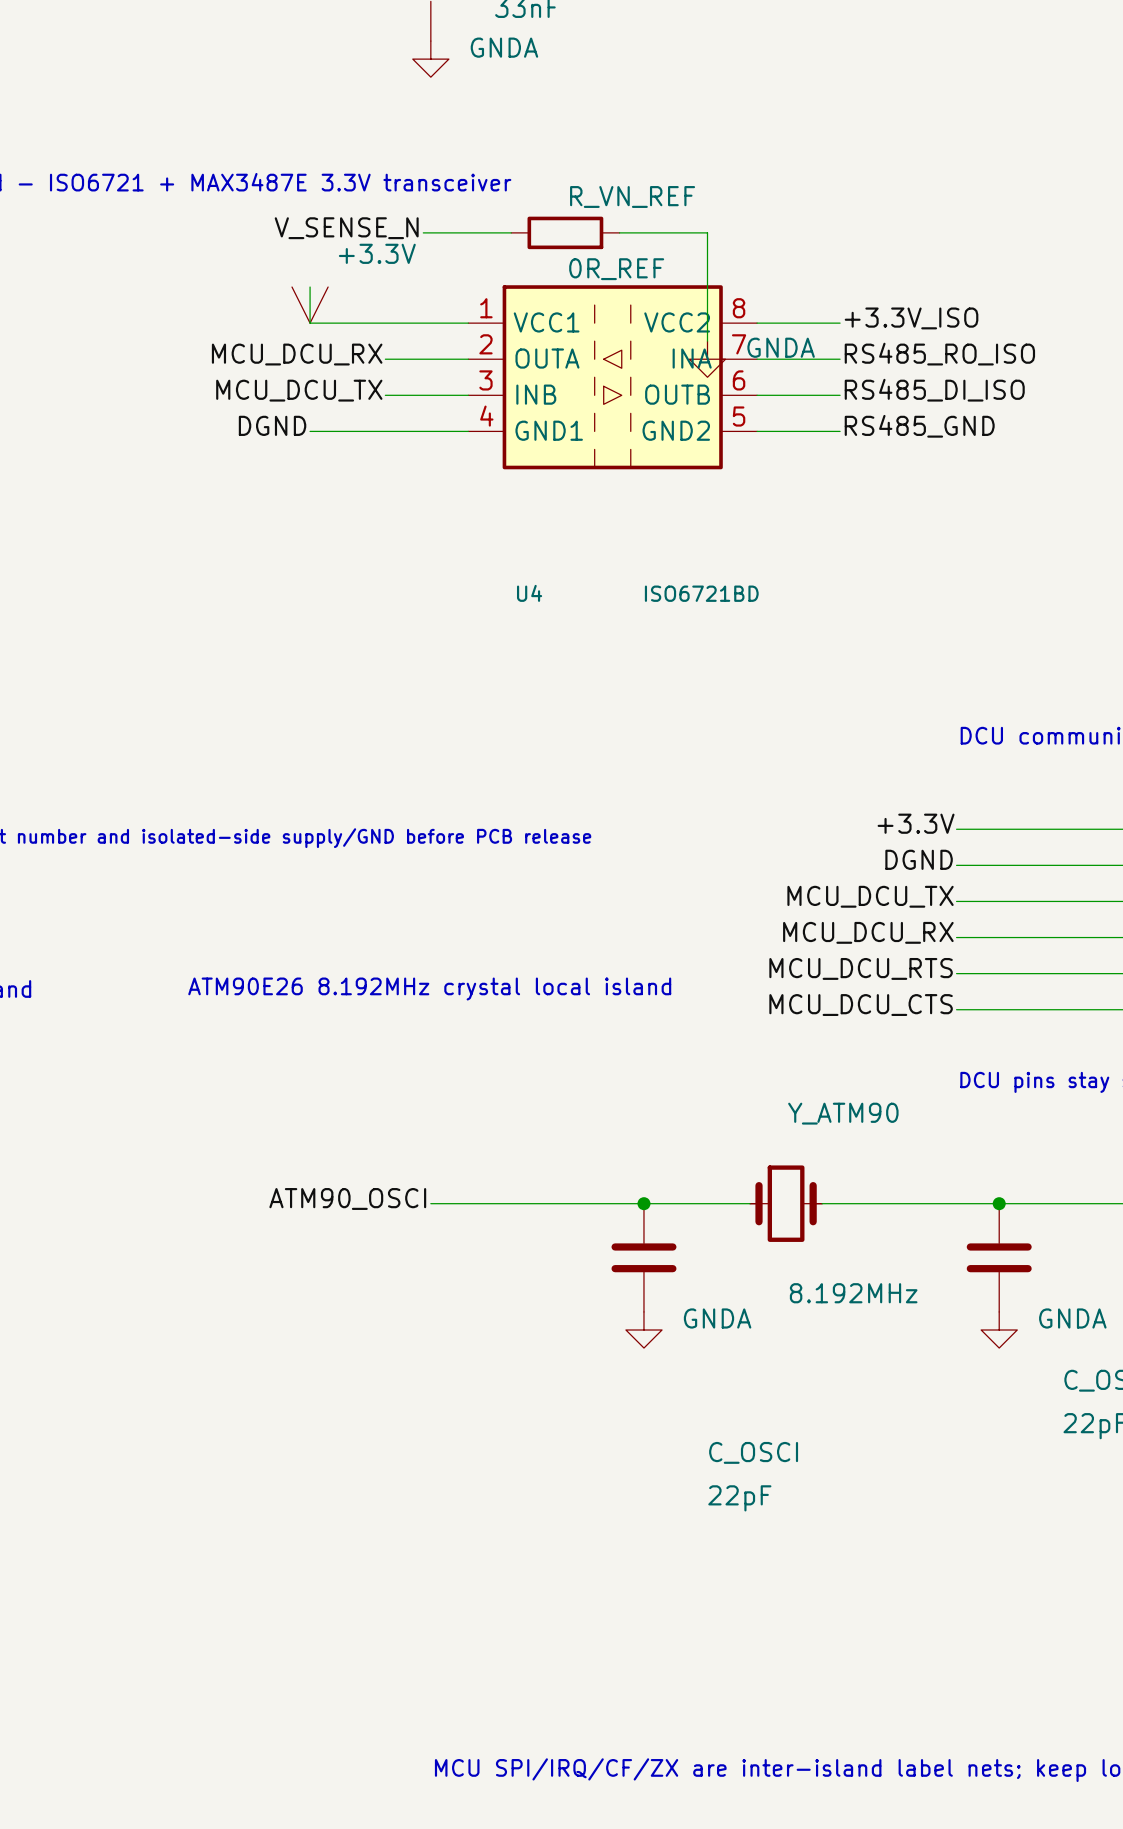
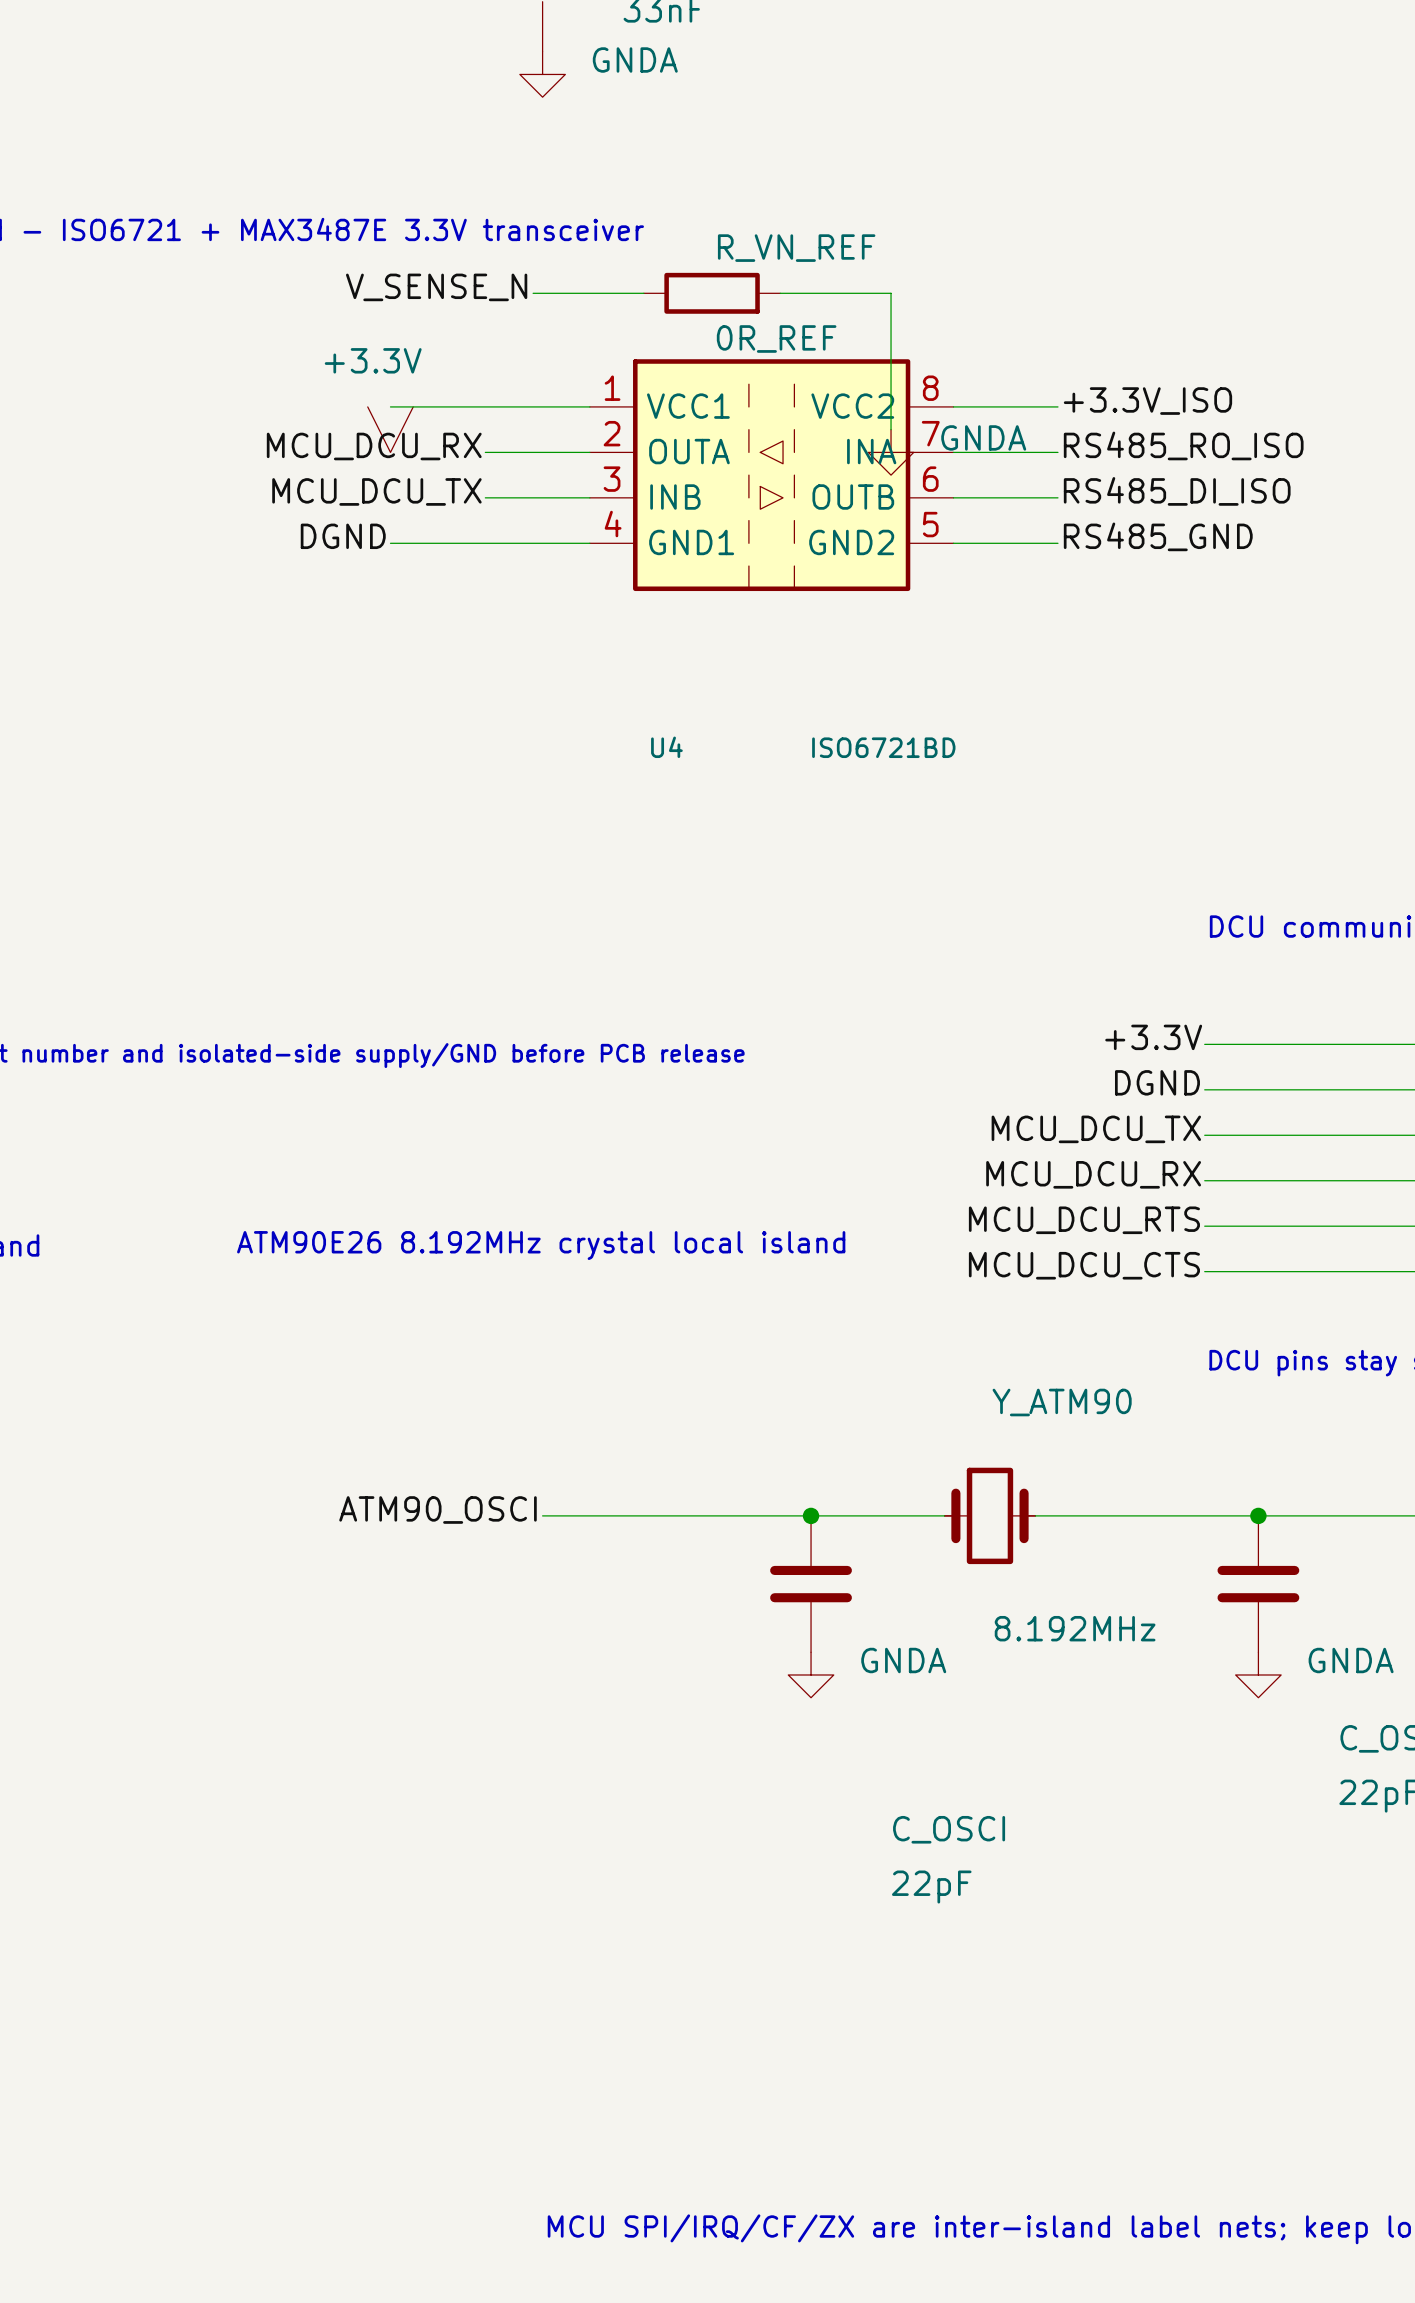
power symbol text position: +3.3V (377, 253) -> +3.3V (373, 360)
wire: (310, 287) (310, 323) -> none
power symbol position: +3.3V (310, 305) -> +3.3V (390, 429)

